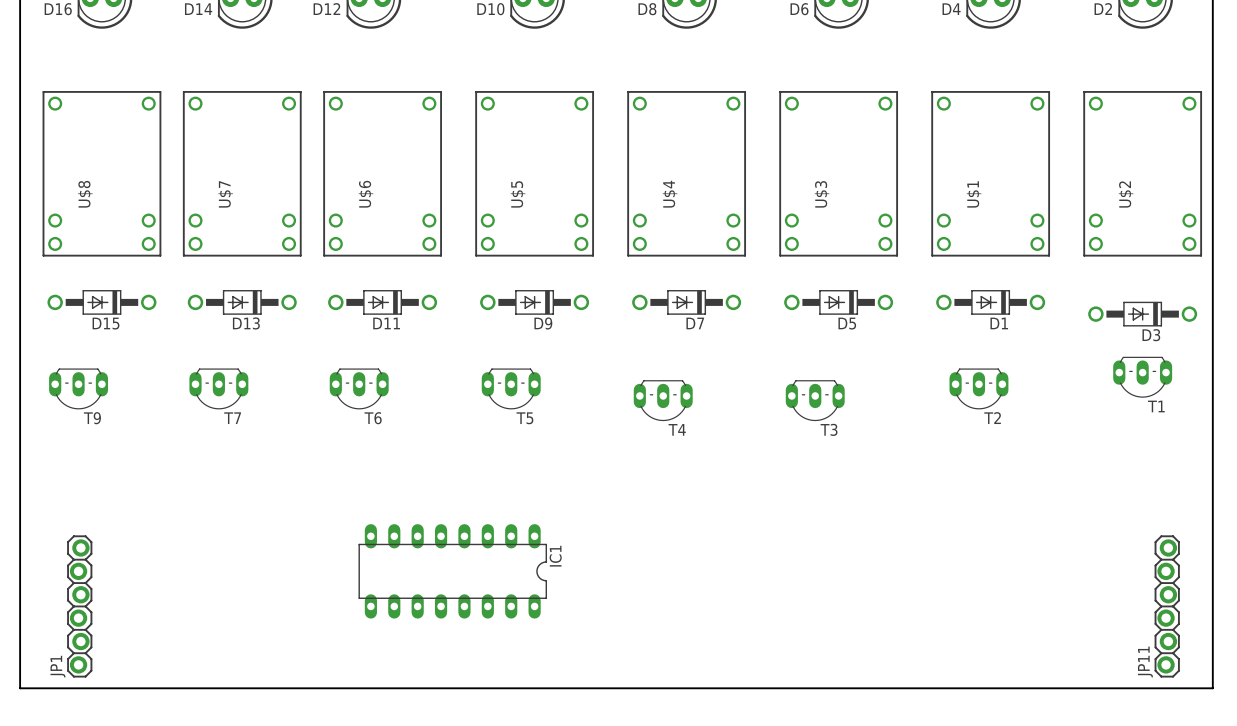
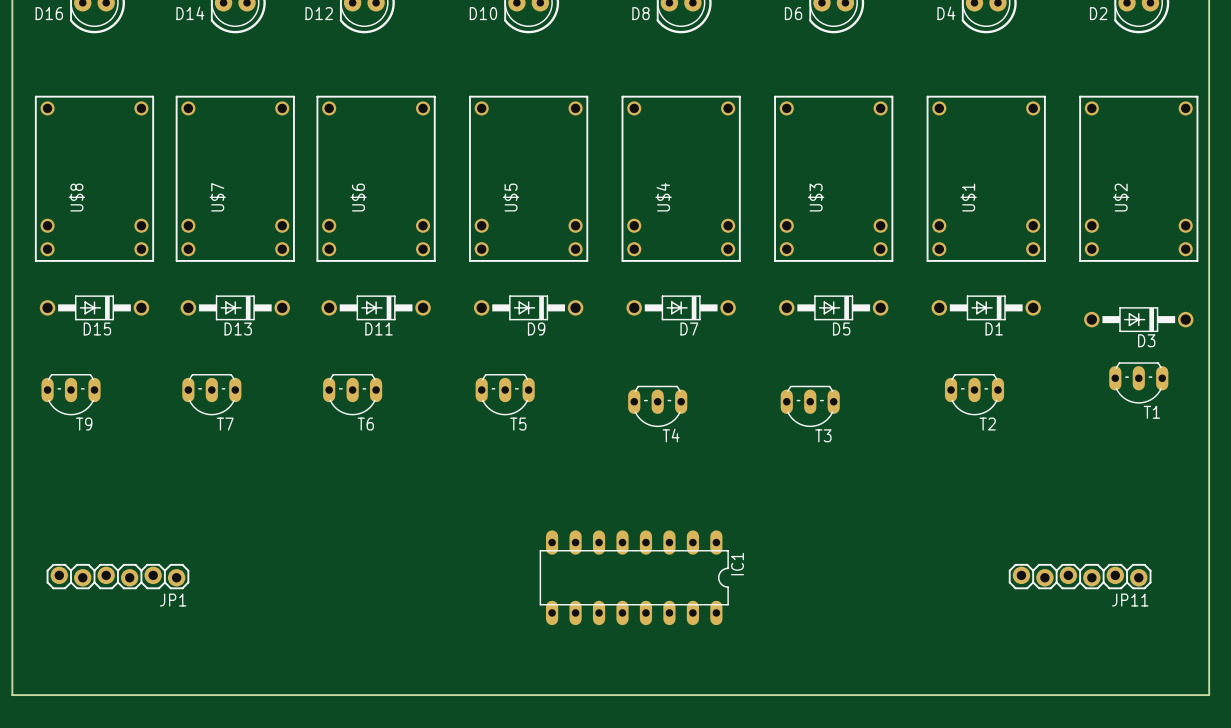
IC1 position: (452, 571) -> (634, 577)
JP1 rotation: 0° (79, 606) -> 90° clockwise (117, 576)
JP11 rotation: 0° (1167, 606) -> 90° clockwise (1080, 576)
JP11 position: (1167, 606) -> (1080, 576)
JP11 name position: JP11 (1145, 661) -> JP11 (1130, 600)
JP1 name position: JP1 (57, 666) -> JP1 (173, 600)

